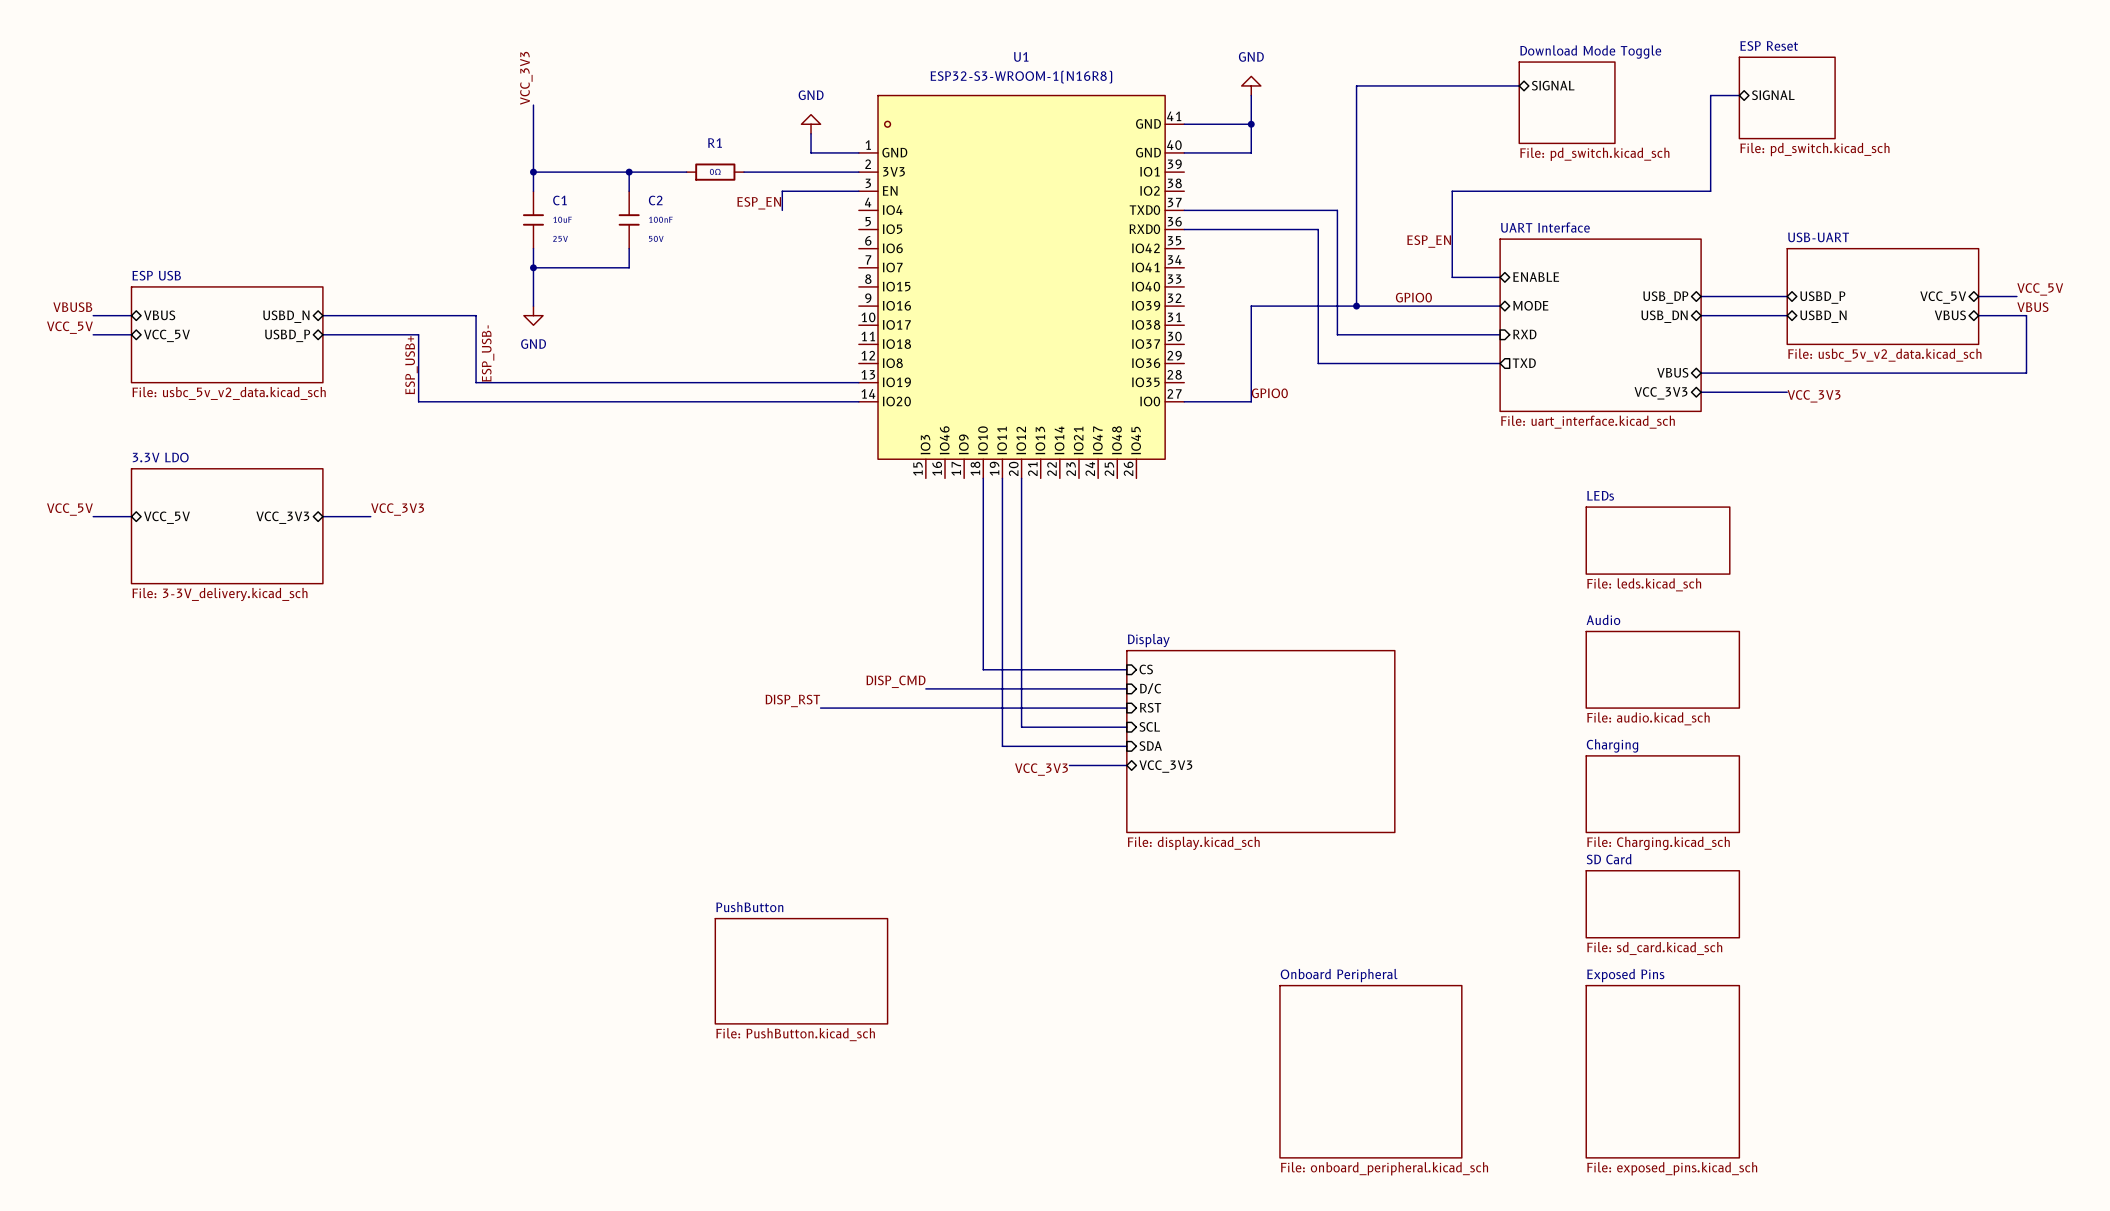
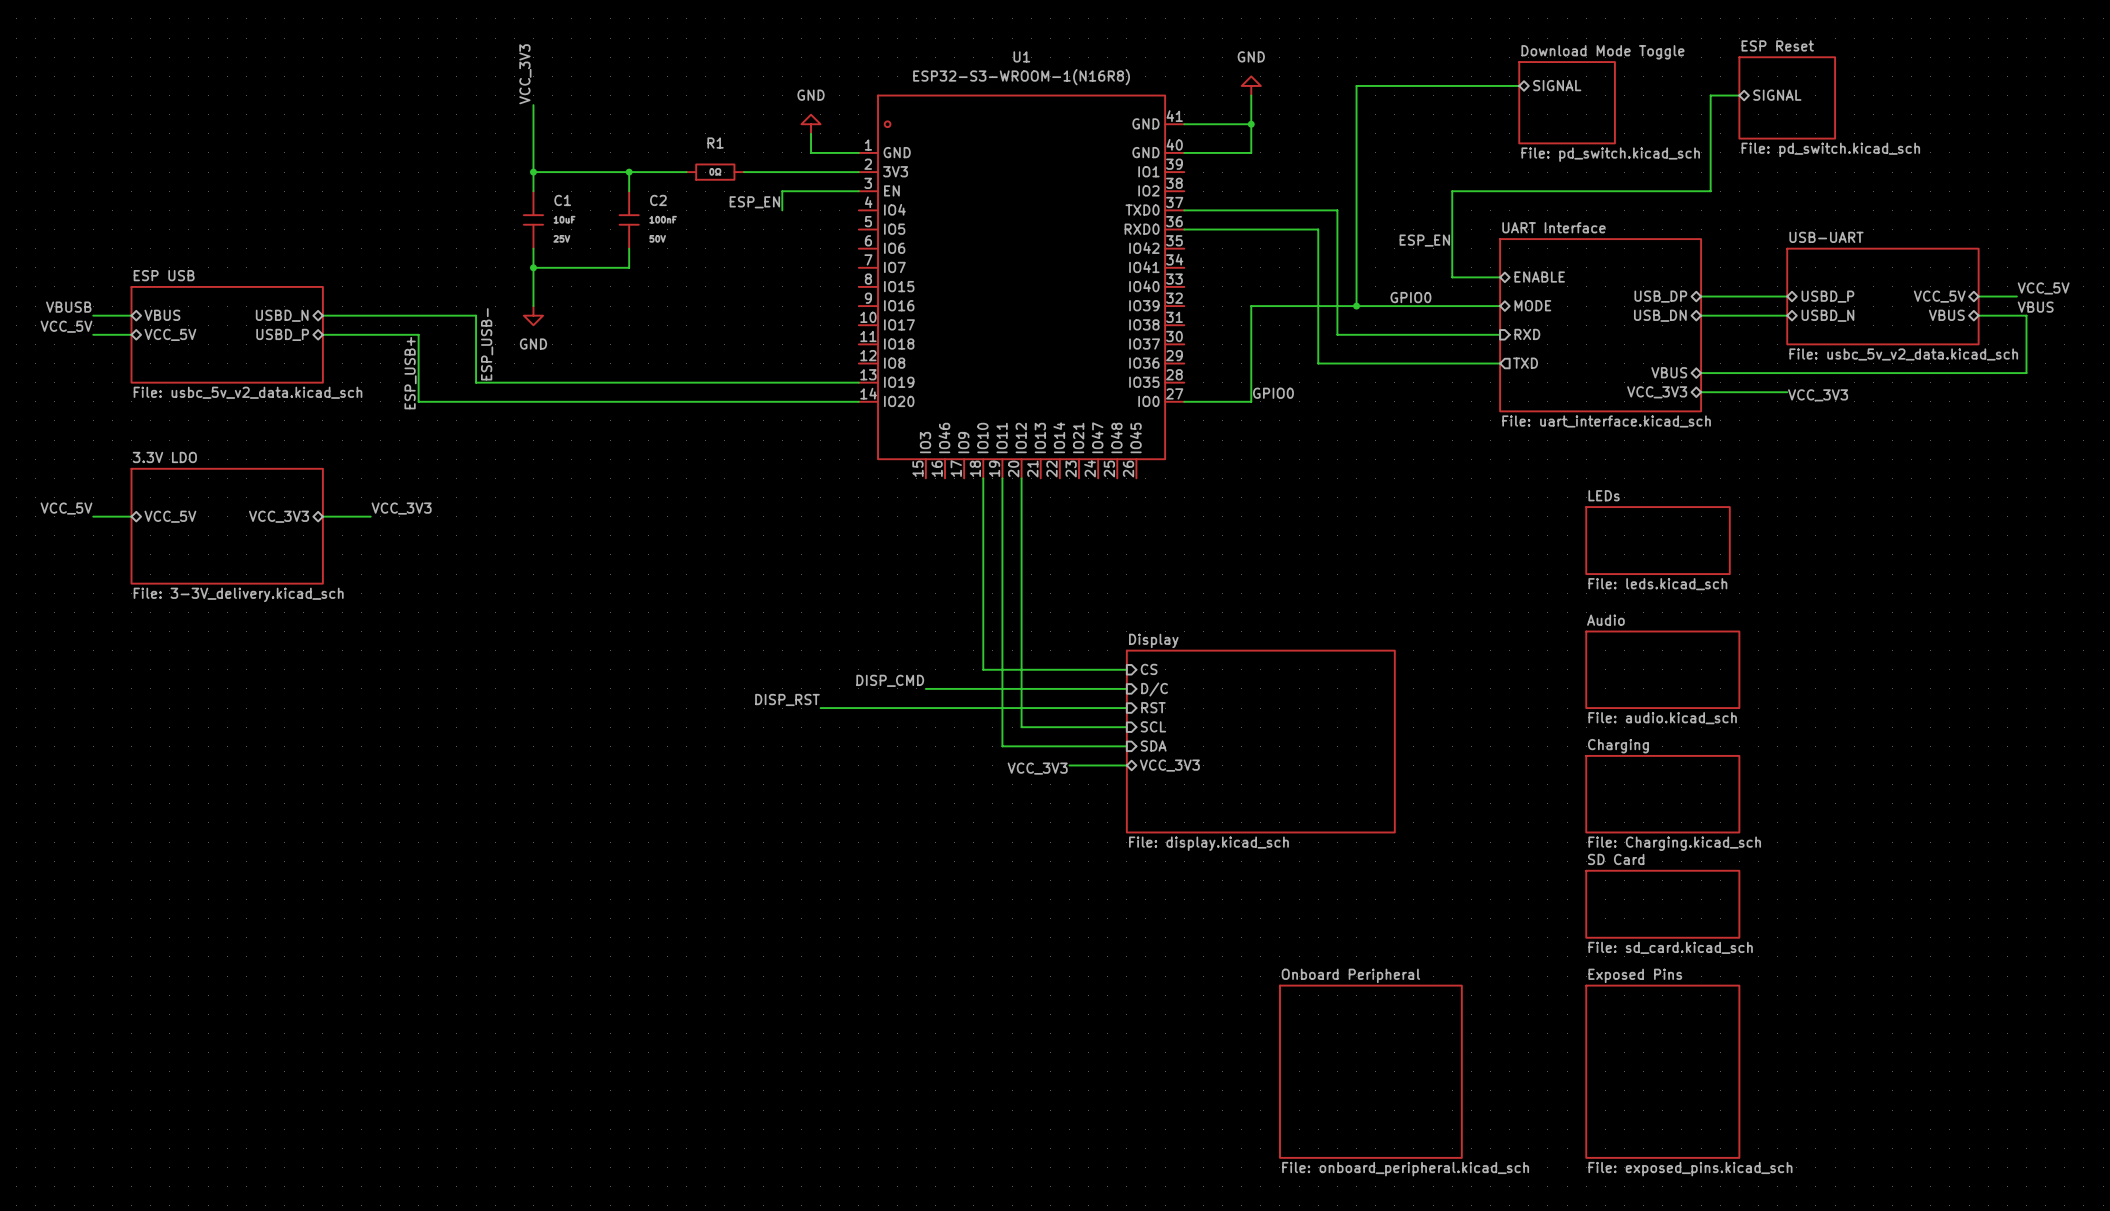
sheet PushButton: File: PushButton.kicad_sch (801, 971) -> none

